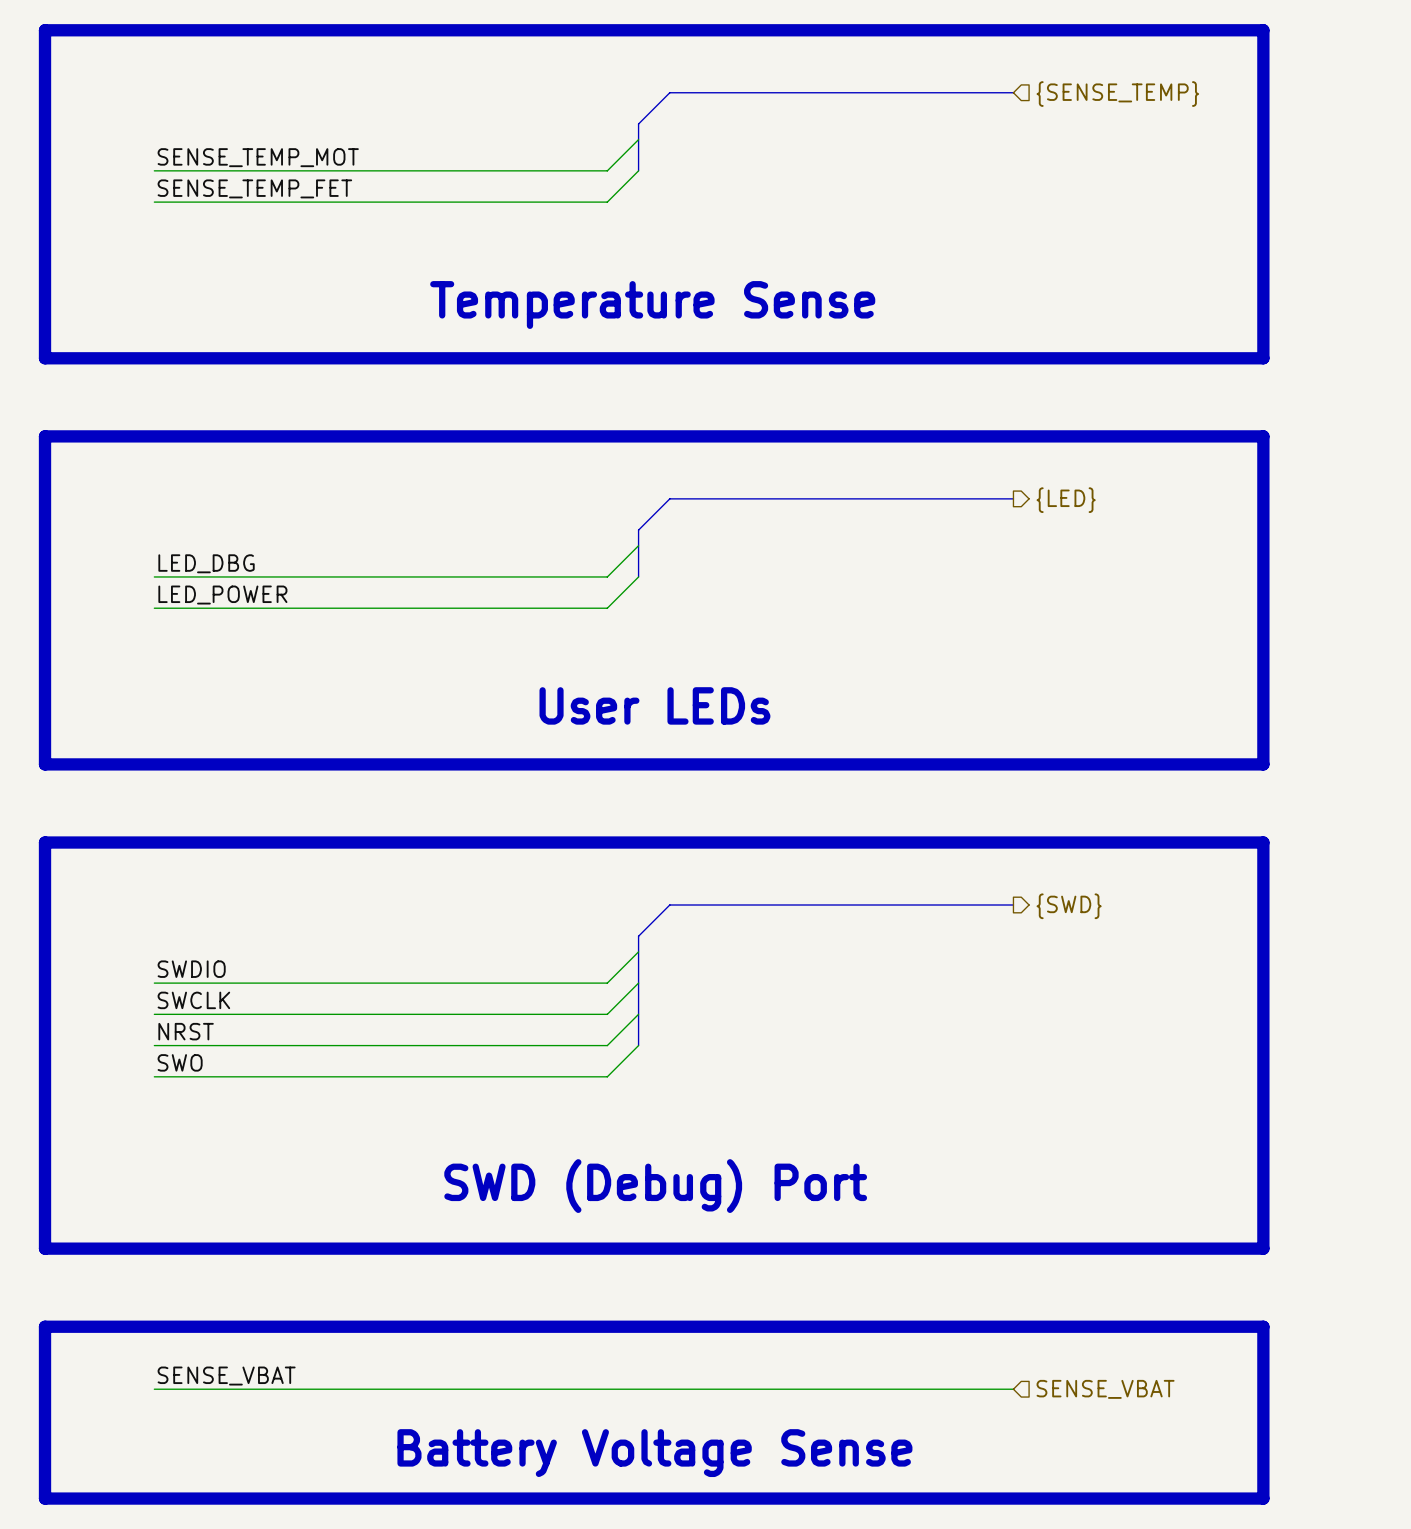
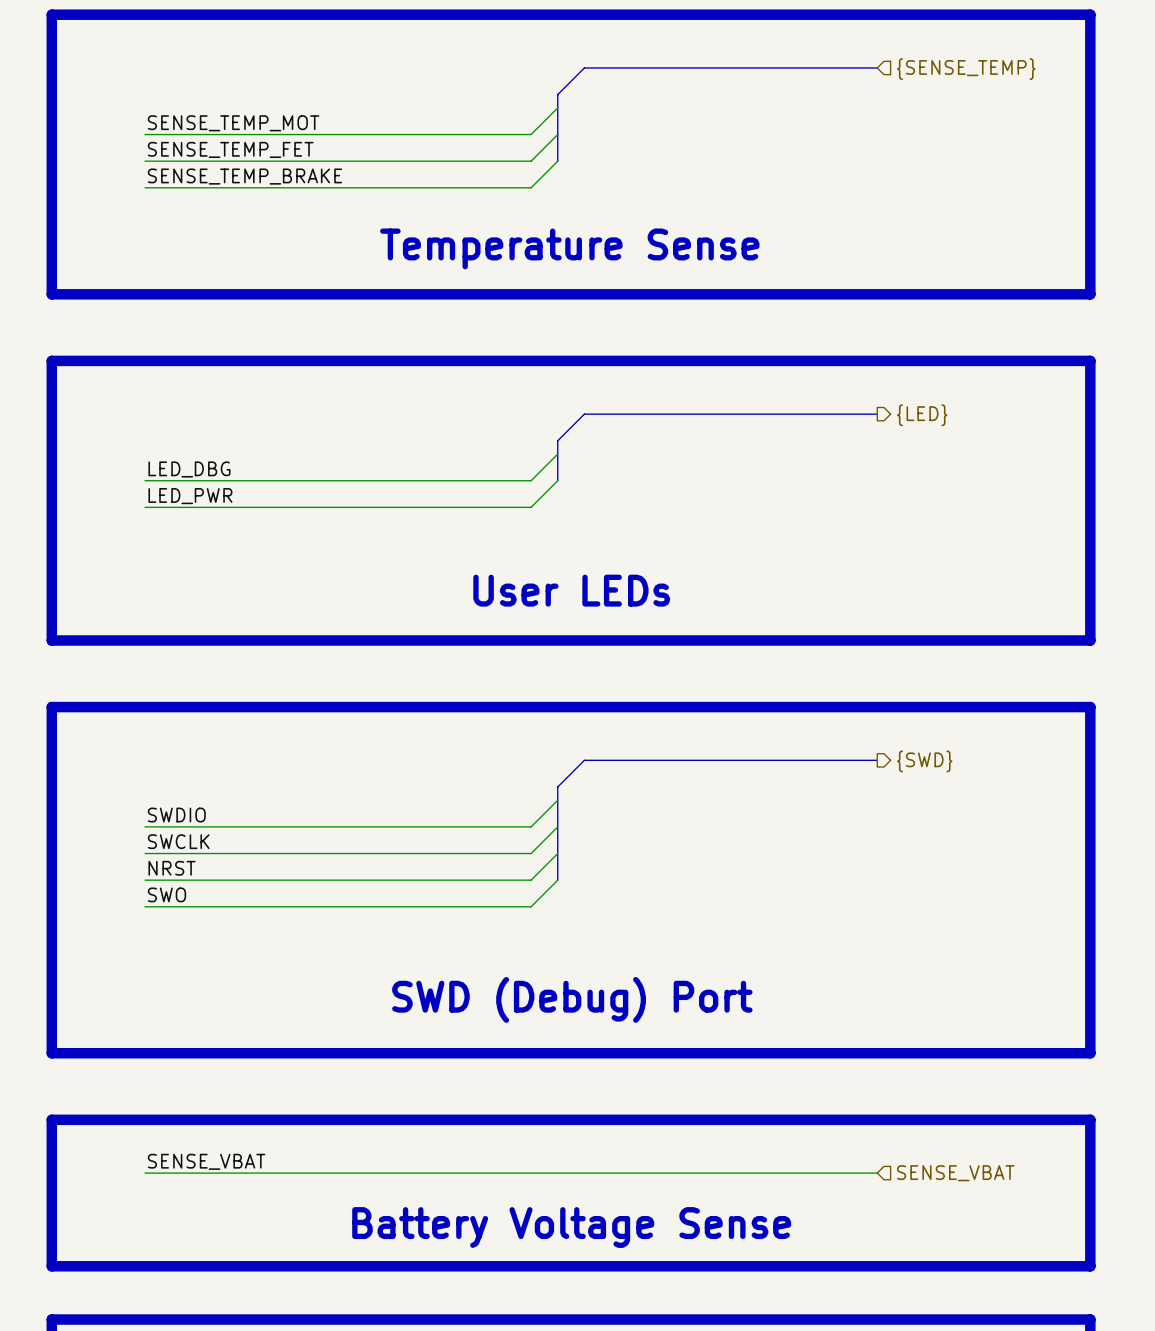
bus: none -> (557, 134) (557, 161)
wire: none -> (557, 161) (531, 187) (145, 187)
label: none -> SENSE_TEMP_BRAKE (244, 176)
label: LED_POWER (222, 595) -> LED_PWR (190, 496)

